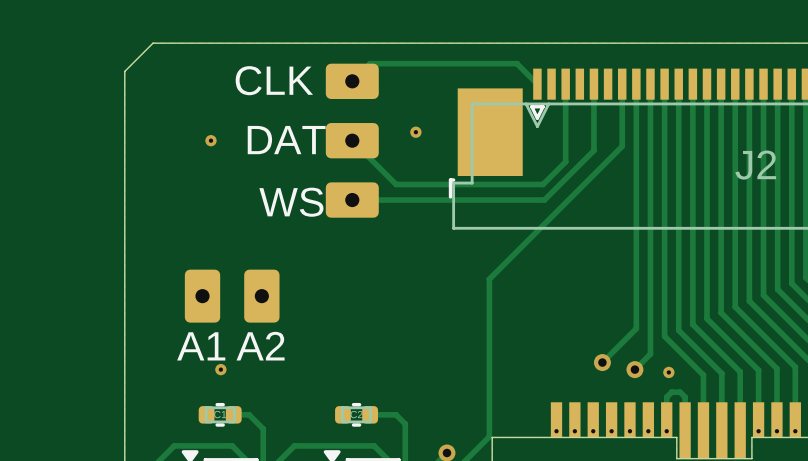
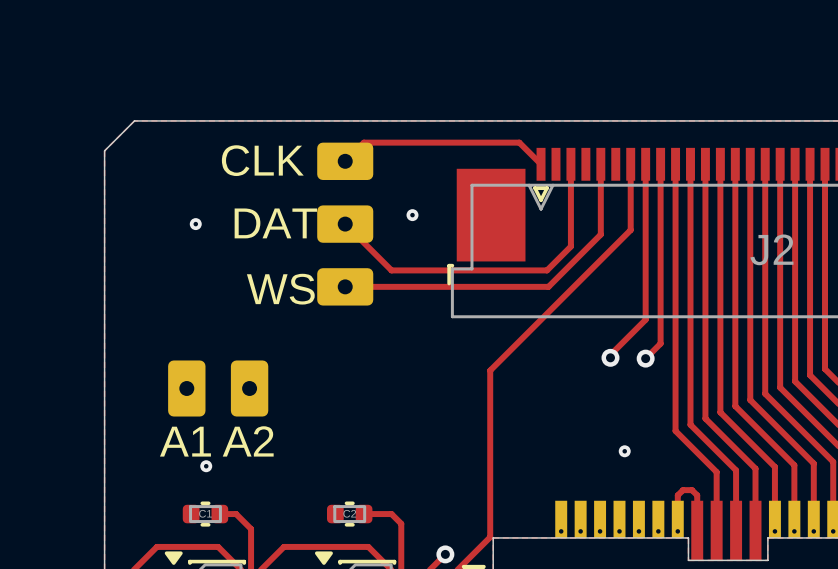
track: (636, 231) (636, 328) (602, 362) (602, 356) -> (645, 319) (610, 354) (610, 357)
track: (650, 253) (650, 354) (634, 369) -> (660, 343) (645, 358)
via: none -> (610, 357)
via: none -> (645, 358)
via: (602, 362) -> none
via: (634, 369) -> none
via position: (668, 372) -> (624, 451)

